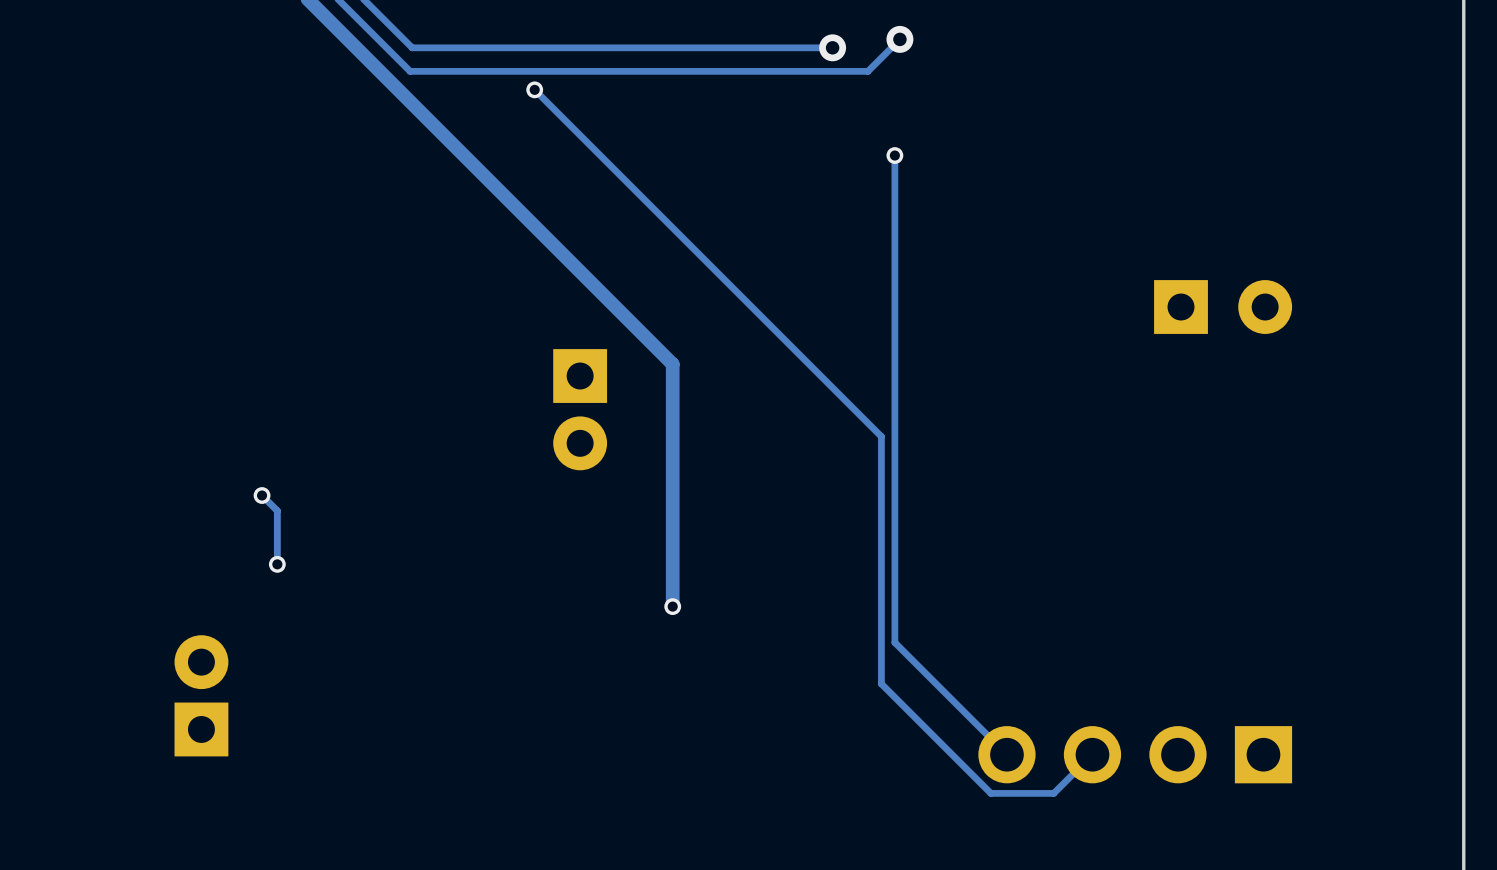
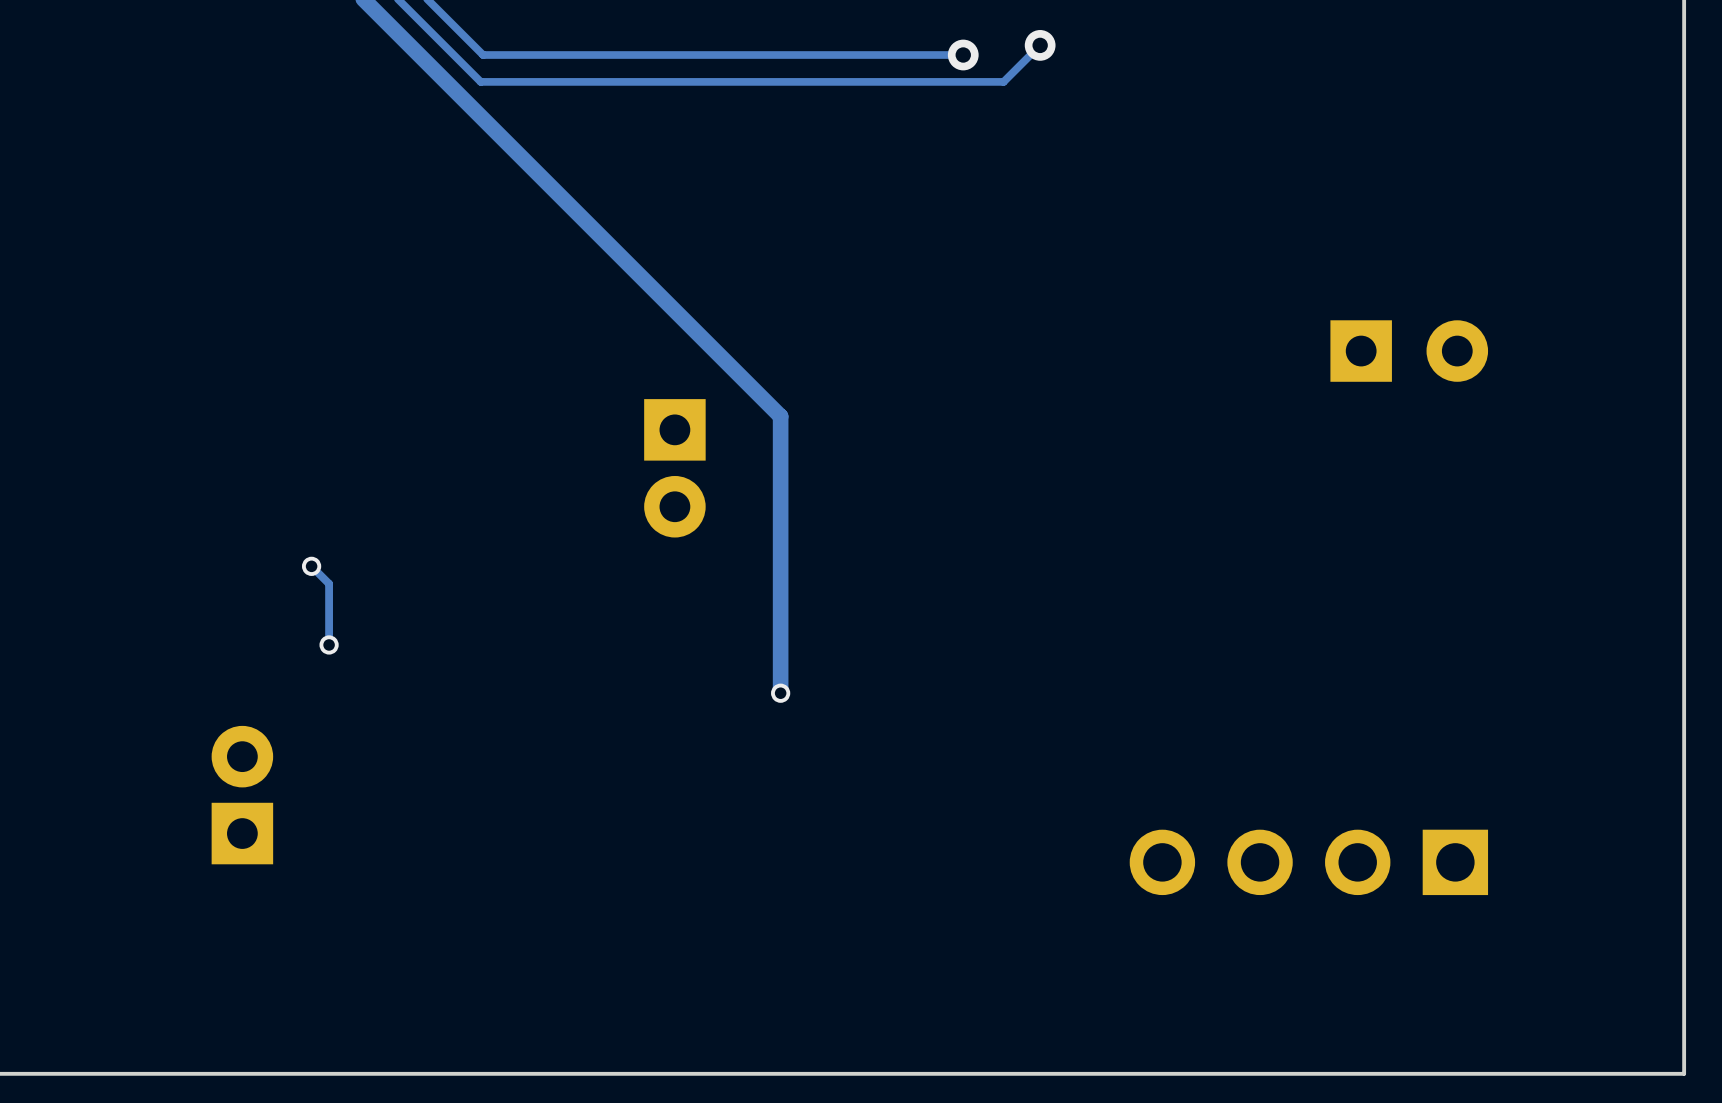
track: (534, 89) (881, 436) (881, 683) (990, 793) (1053, 793) (1092, 754) -> none
via: (534, 89) -> none
track: (894, 155) (894, 642) (1006, 754) -> none
via: (894, 155) -> none

